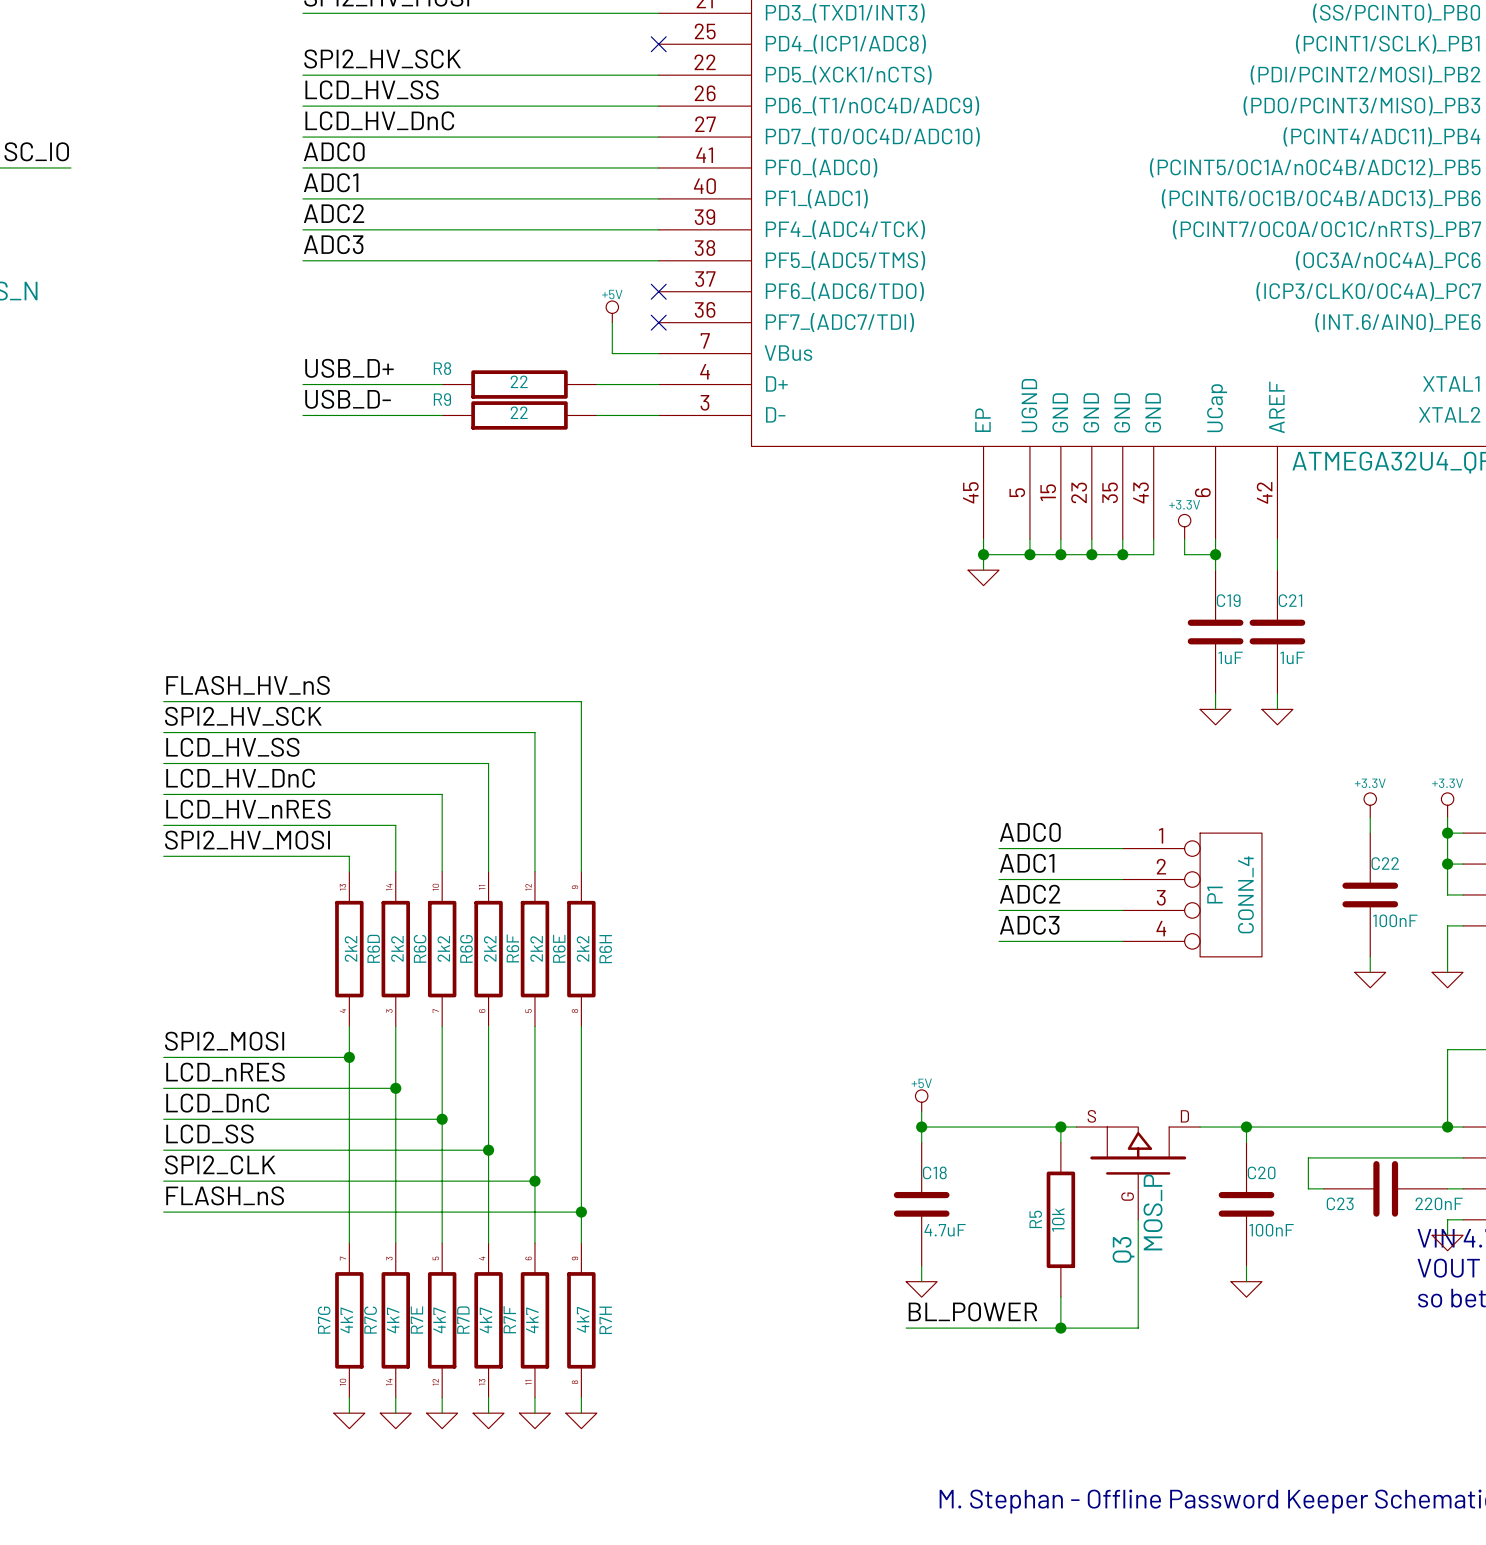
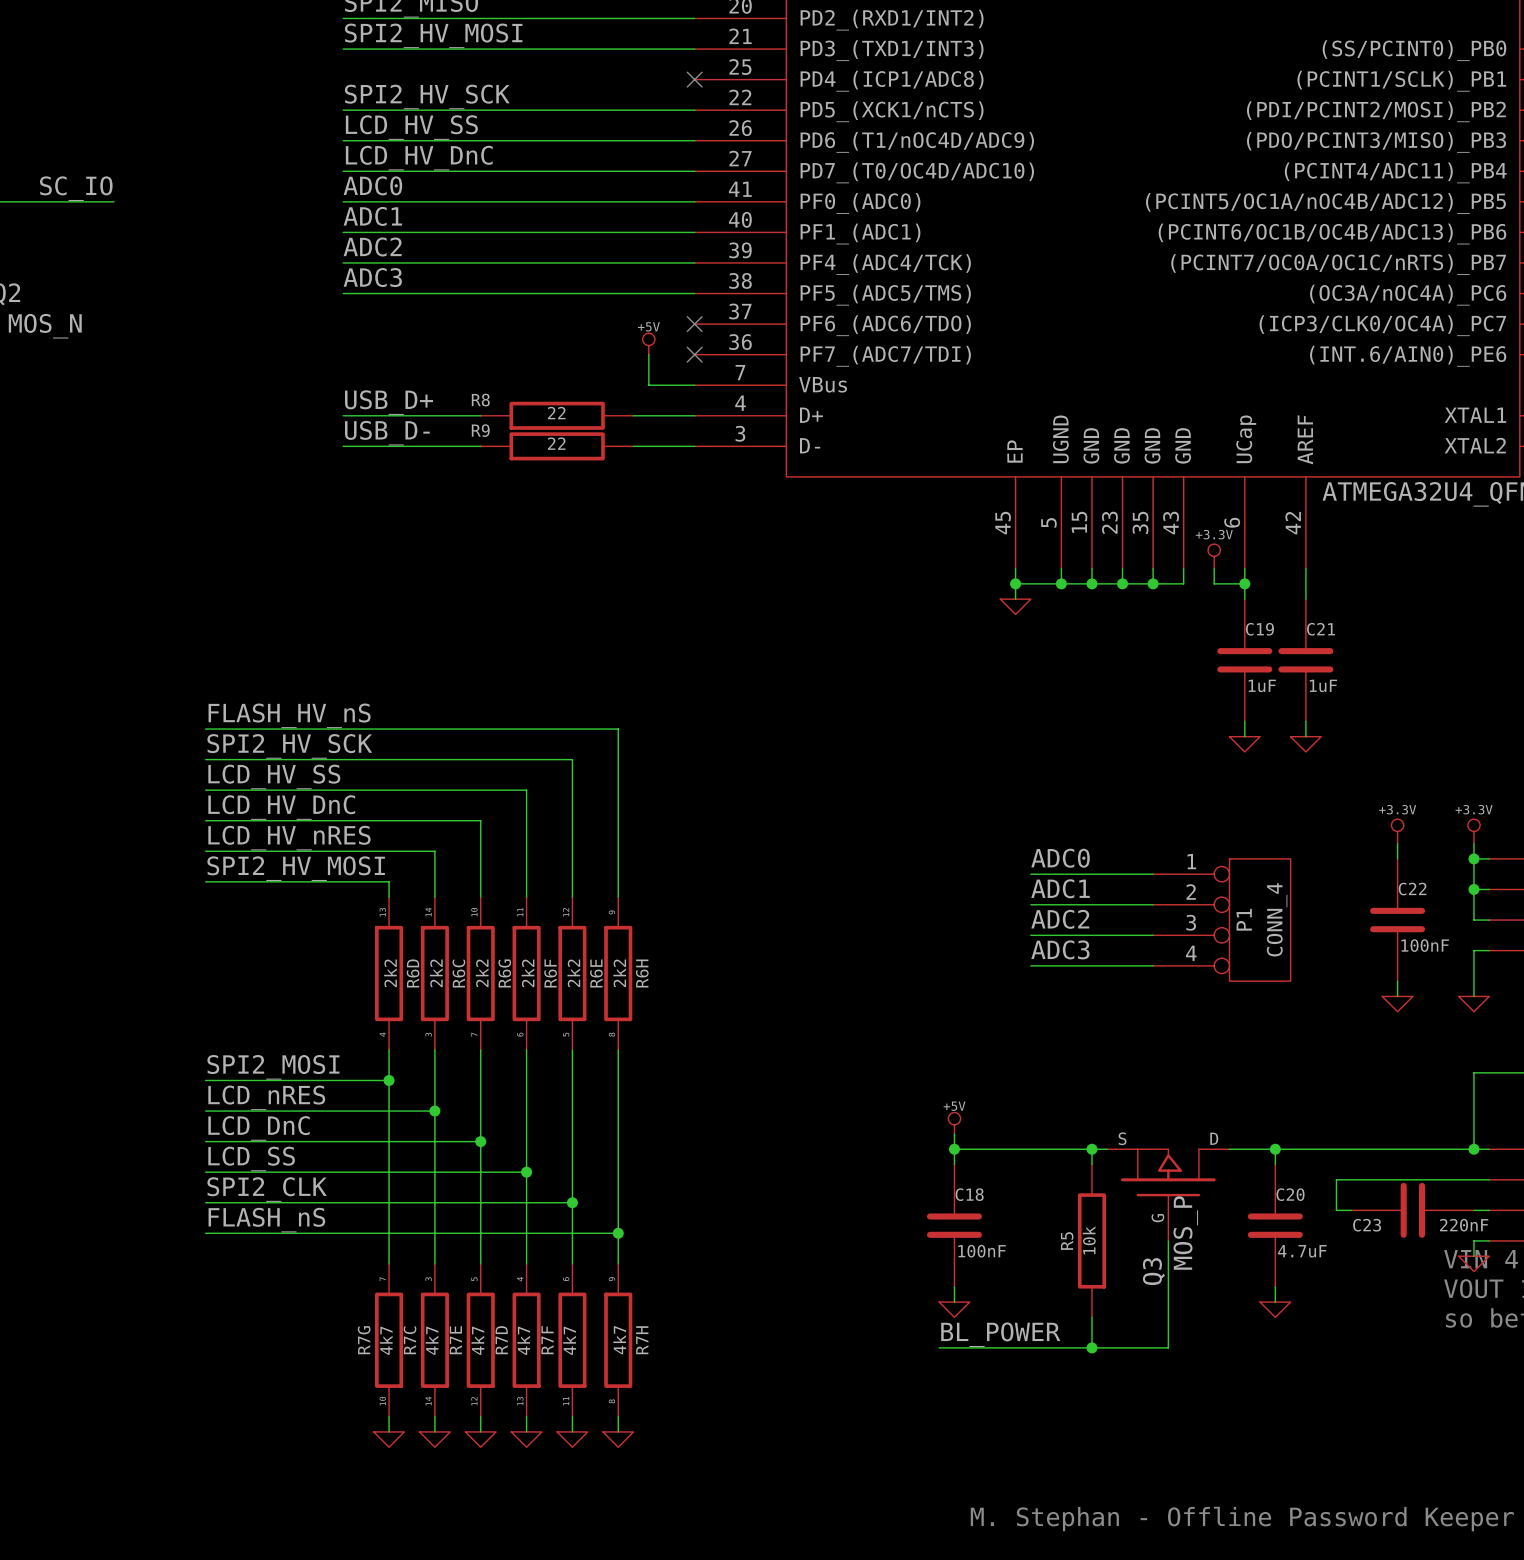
C18 value: 4.7uF (945, 1230) -> 100nF (982, 1251)
C20 value: 100nF (1271, 1230) -> 4.7uF (1302, 1251)

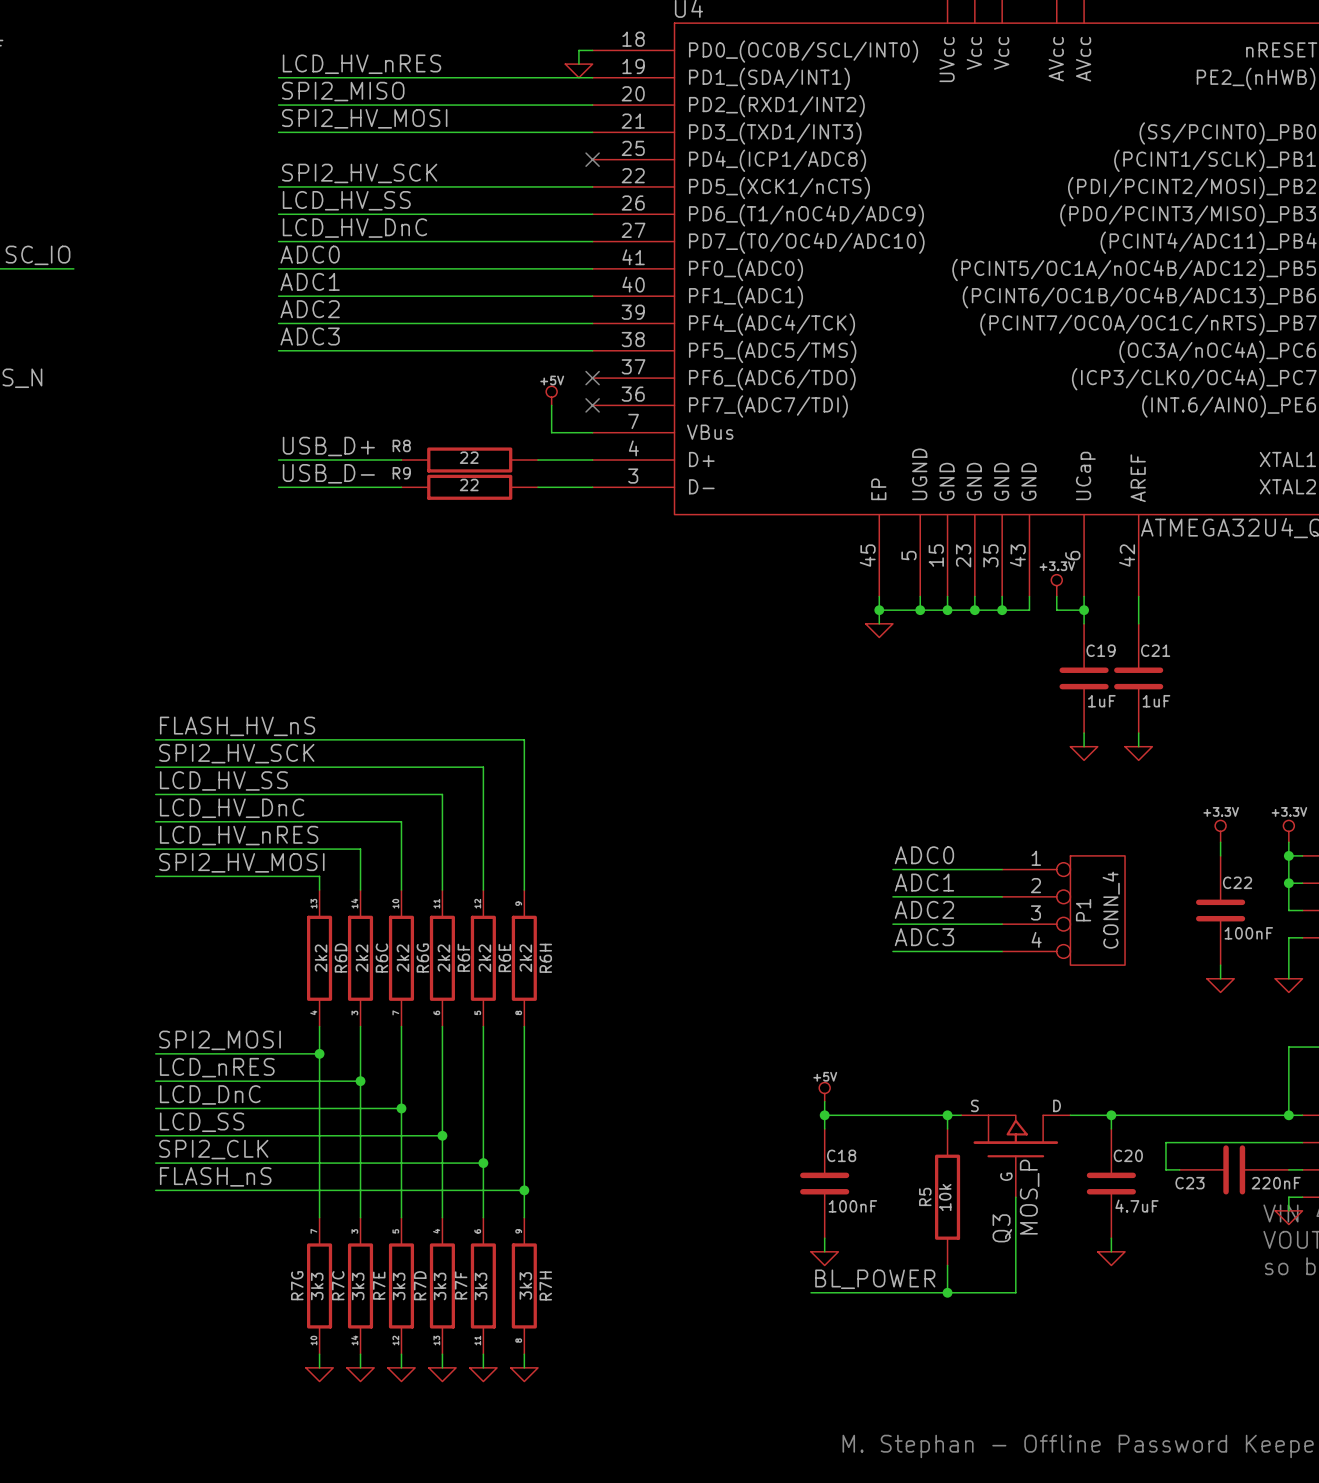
R7G value: 4k7 (386, 1340) -> 3k3 (317, 1286)
R7C value: 4k7 (432, 1340) -> 3k3 (358, 1286)
R7E value: 4k7 (477, 1340) -> 3k3 (399, 1286)
R7D value: 4k7 (523, 1340) -> 3k3 (440, 1286)
R7F value: 4k7 (569, 1340) -> 3k3 (481, 1286)
R7H value: 4k7 (619, 1340) -> 3k3 (525, 1285)

